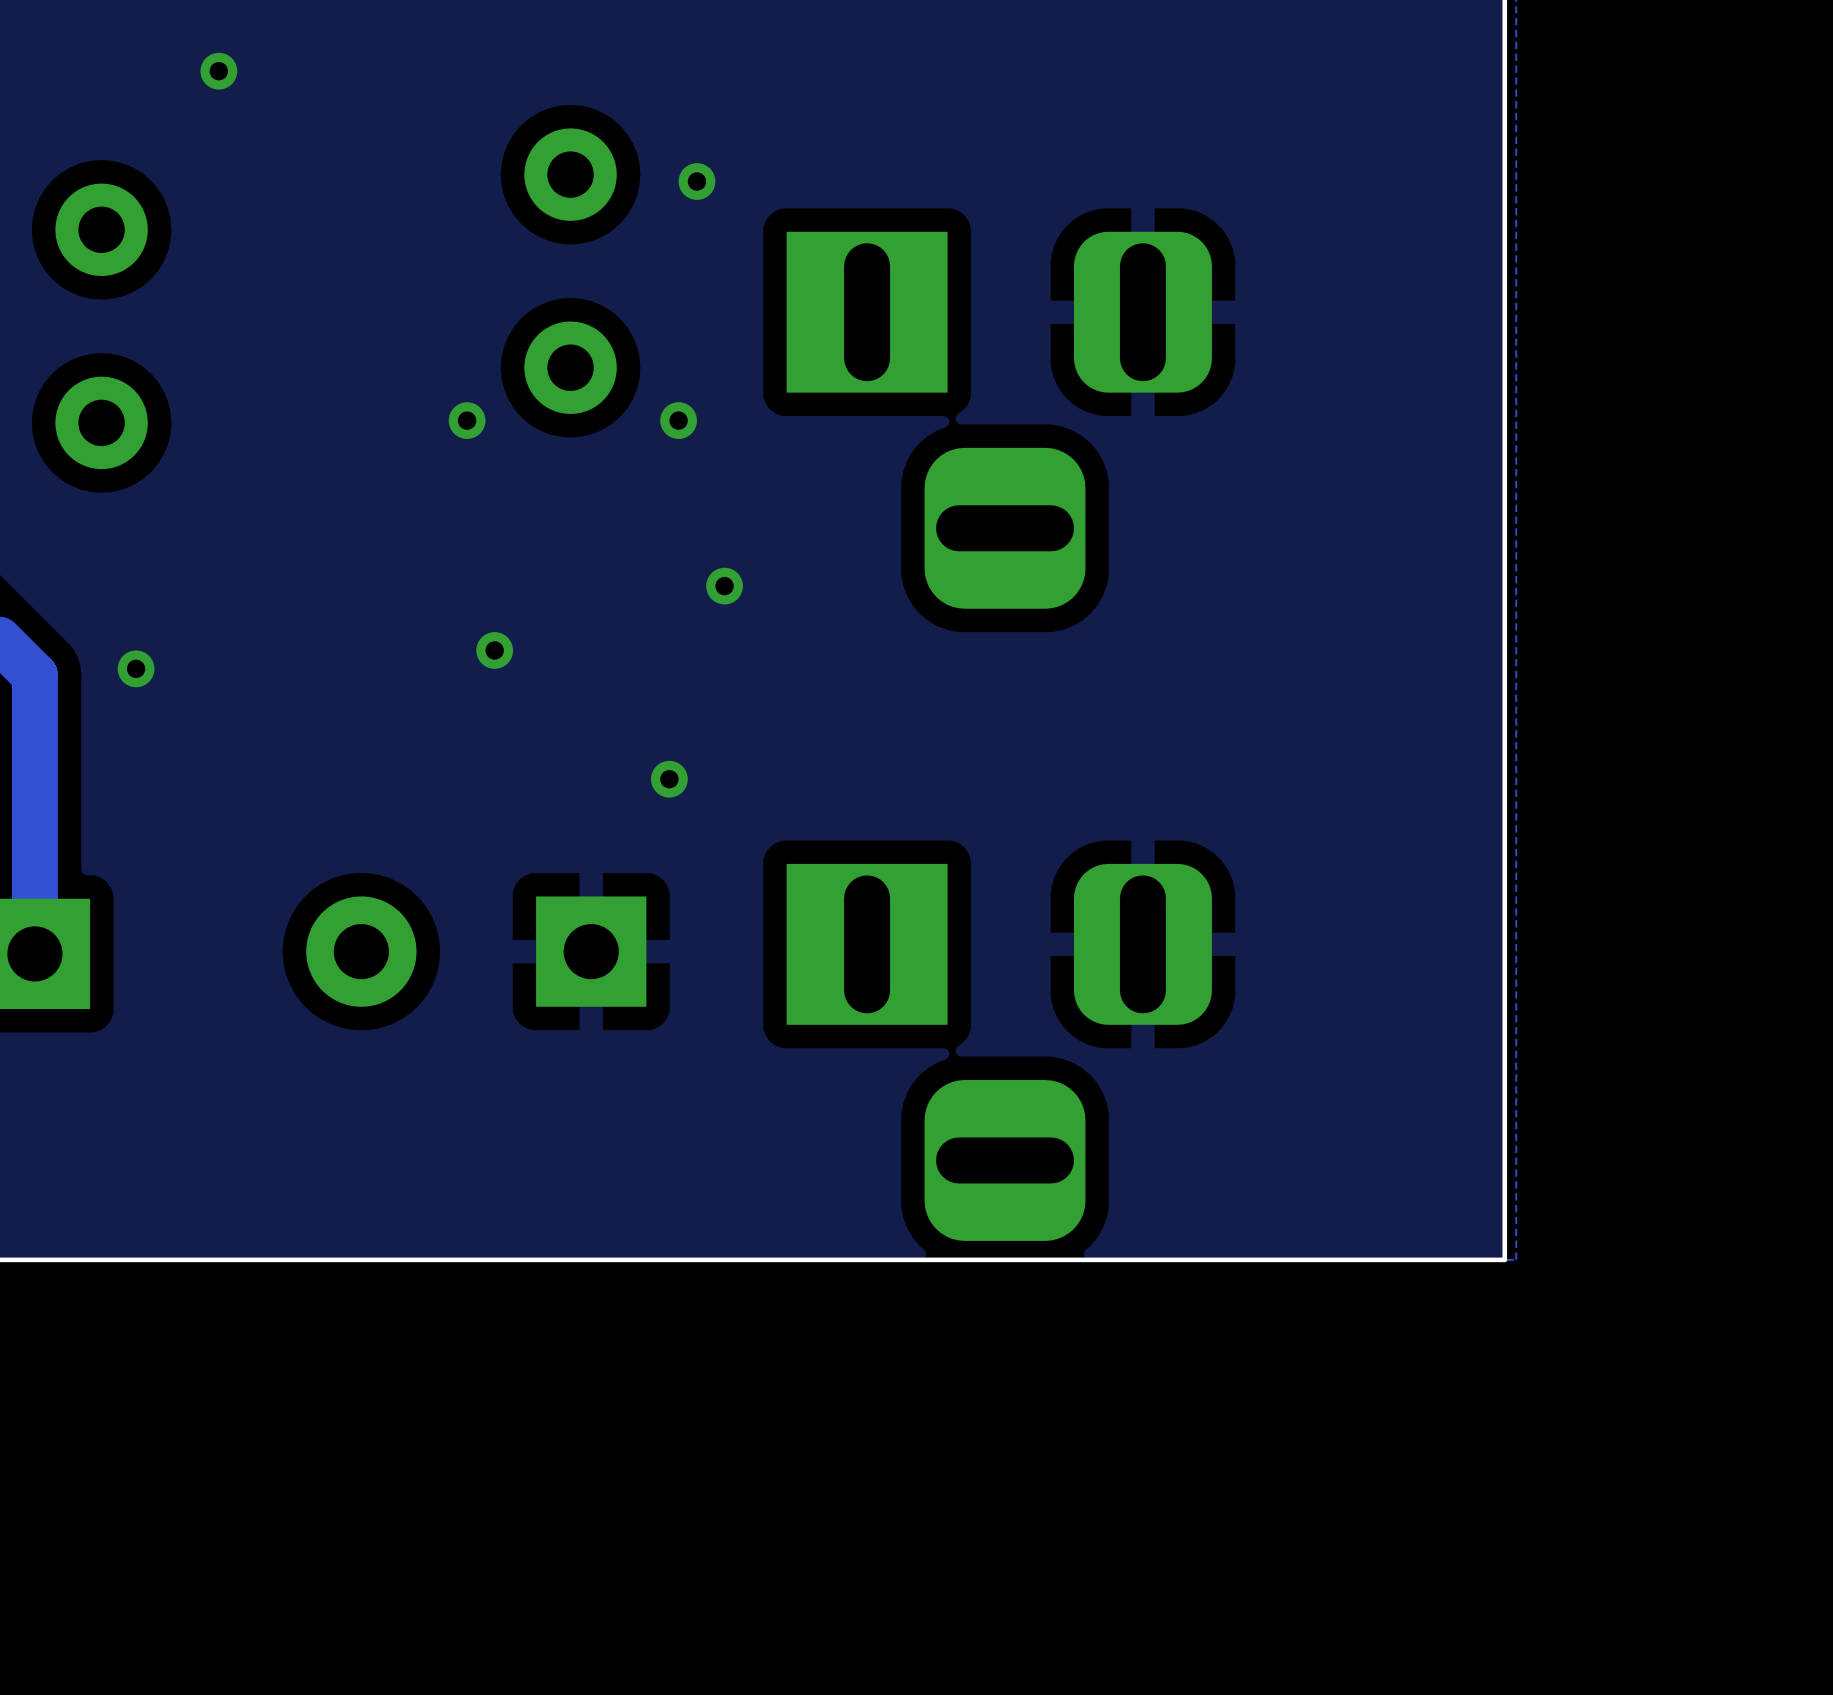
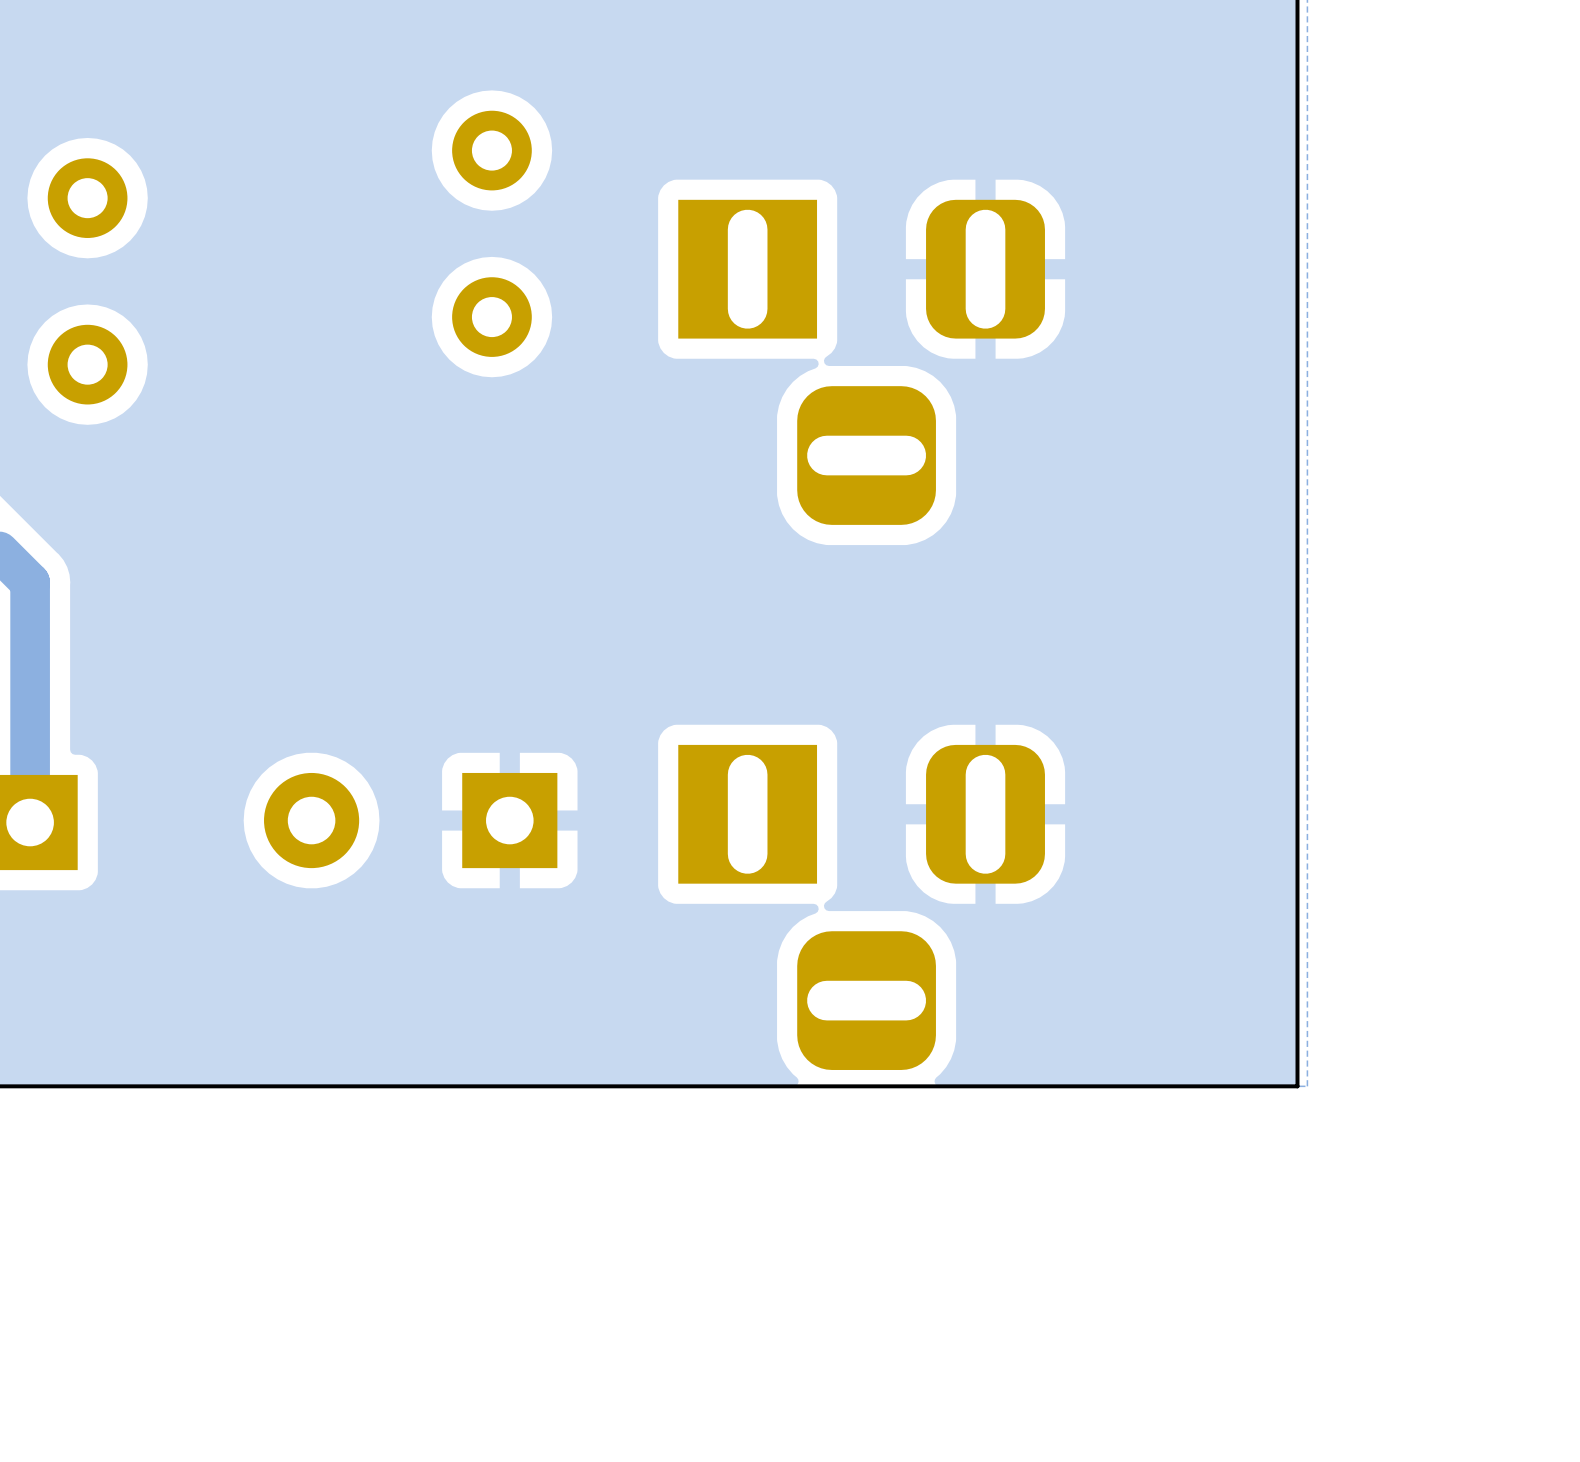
via: (218, 71) -> none
via: (696, 181) -> none
via: (467, 420) -> none
via: (678, 420) -> none
via: (724, 586) -> none
via: (494, 650) -> none
via: (136, 668) -> none
via: (669, 779) -> none

